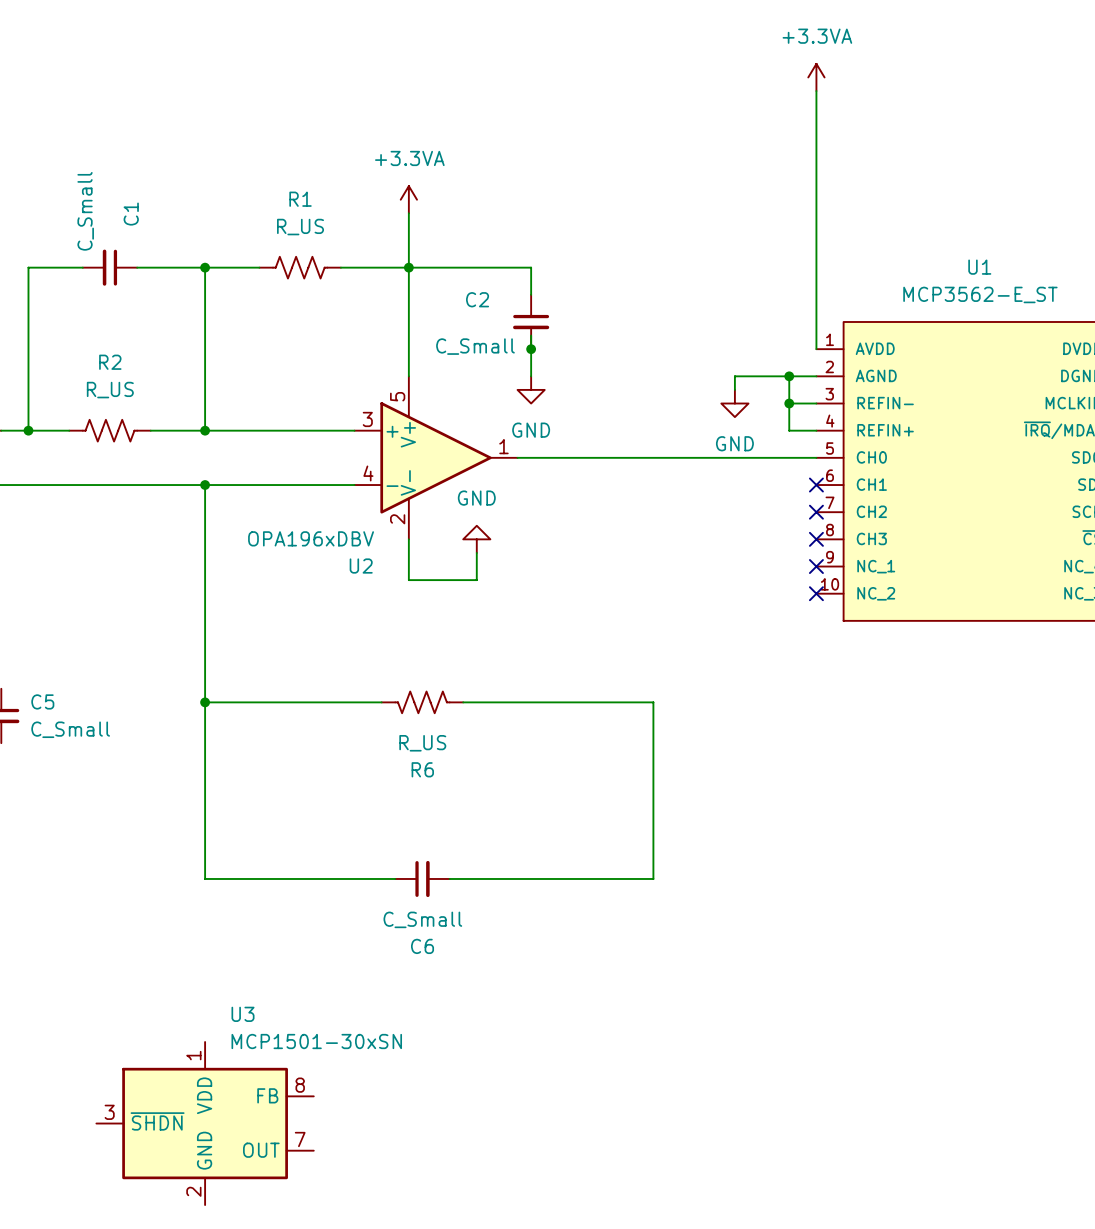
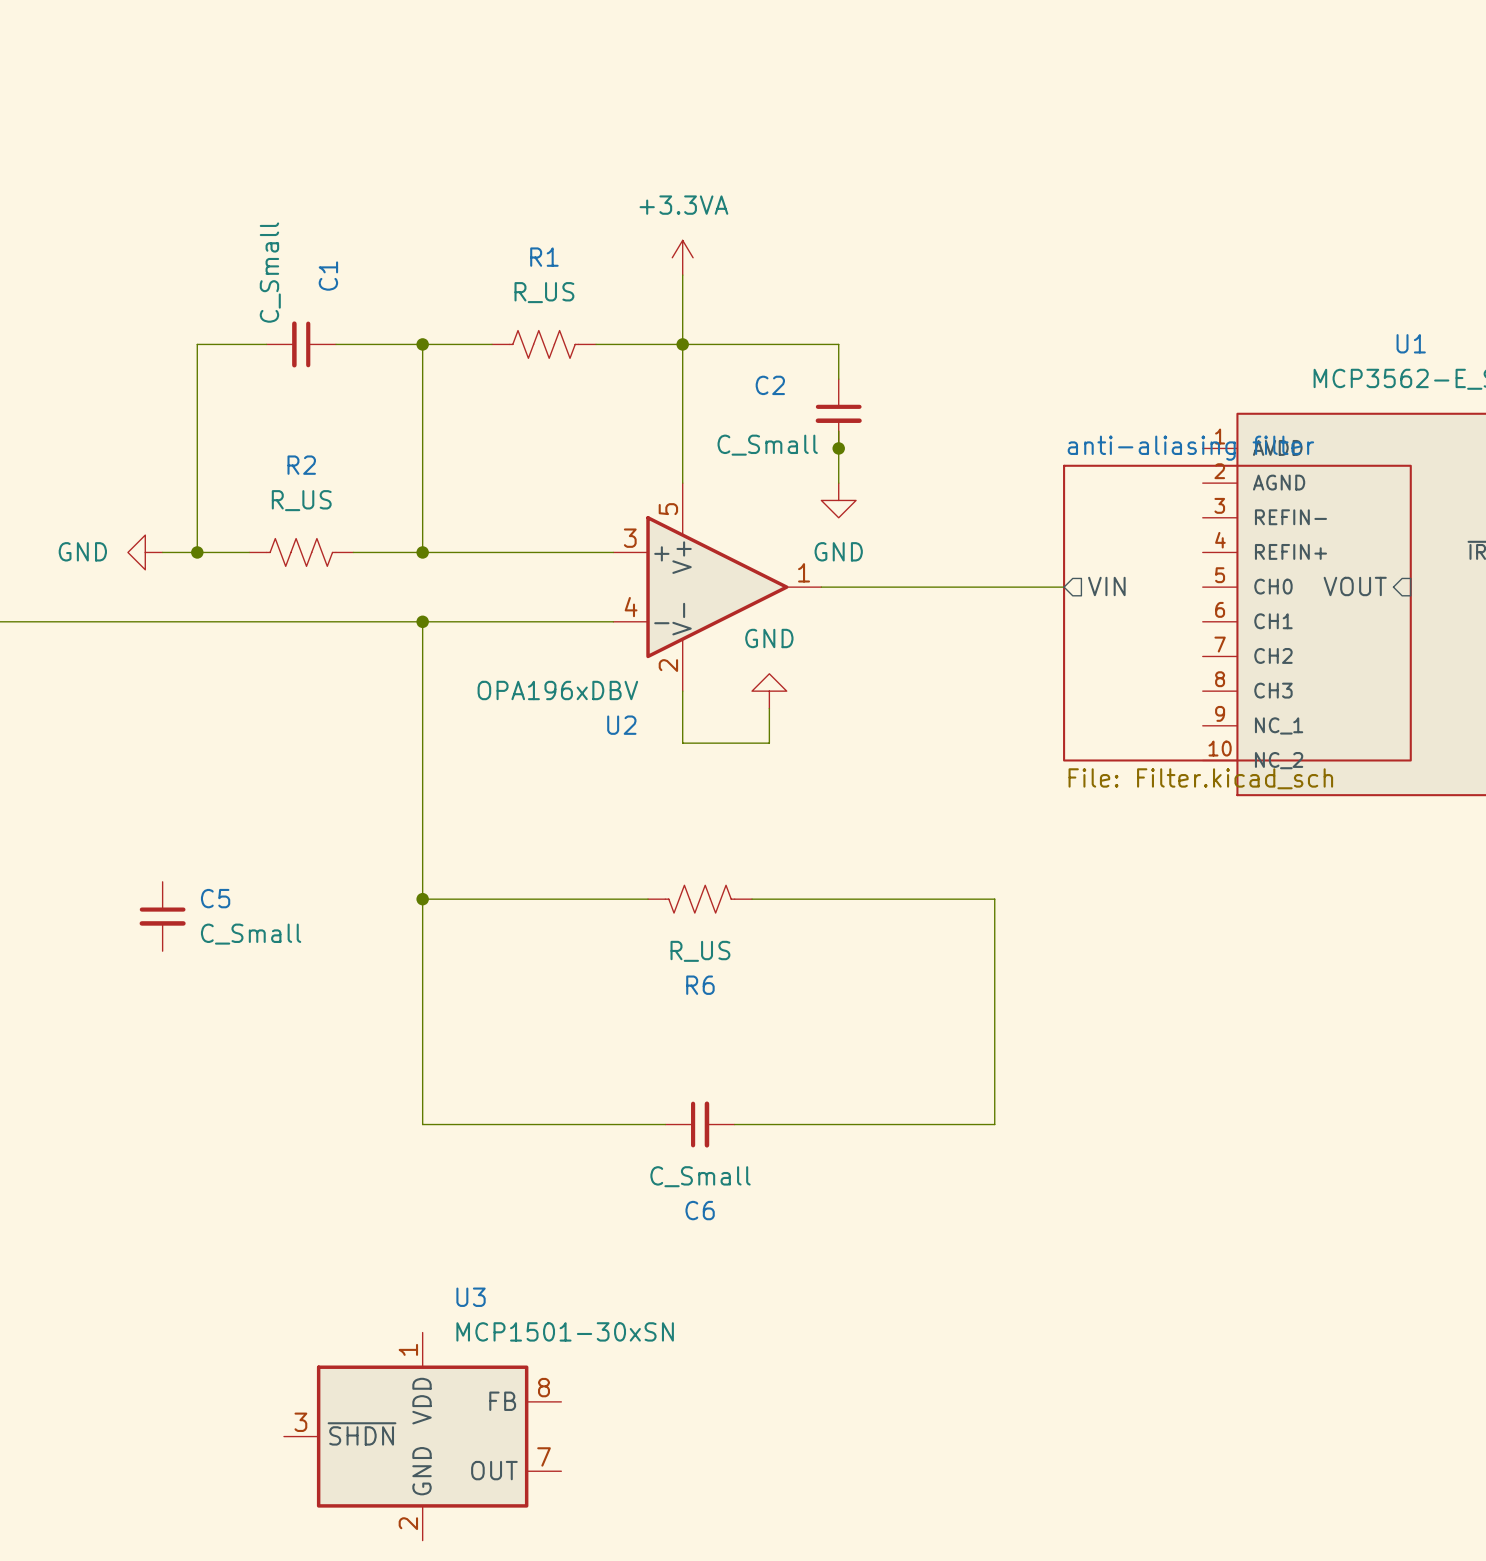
power symbol: +3.3VA (816, 77) -> none
wire: (816, 91) (816, 349) -> none
wire: (789, 376) (789, 430) (816, 430) -> none
junction: (789, 376) -> none
wire: (816, 376) (734, 376) (734, 389) -> none
power symbol: GND (734, 403) -> none
wire: (789, 403) (816, 403) -> none
junction: (789, 403) -> none
wire: (707, 457) (816, 457) -> none
sheet pin: none -> VIN (1106, 586)
sheet pin: none -> VOUT (1355, 586)
sheet anti-aliasing filter: none -> File: Filter.kicad_sch (1237, 613)
no-connect mark: (816, 485) -> none
no-connect mark: (816, 512) -> none
no-connect mark: (816, 539) -> none
no-connect mark: (816, 566) -> none
no-connect mark: (816, 593) -> none

